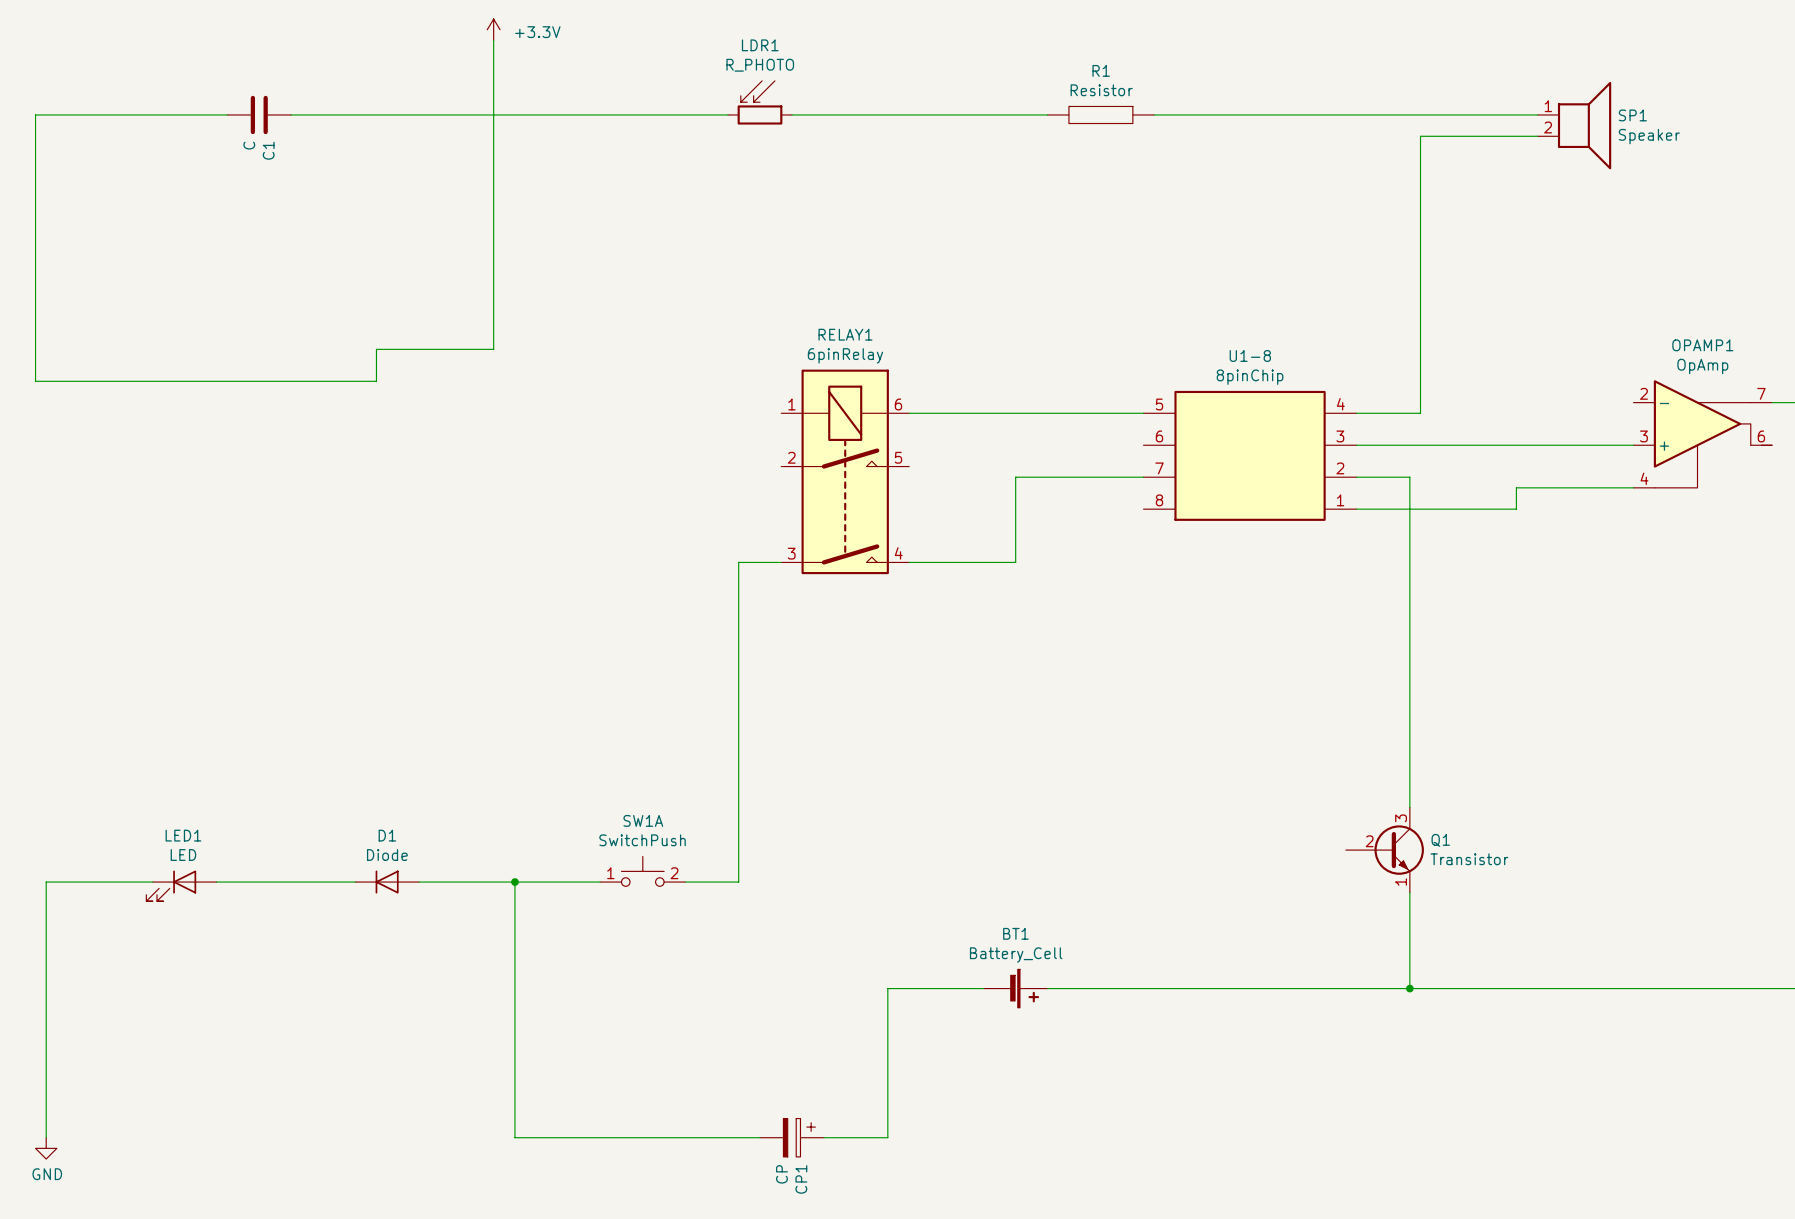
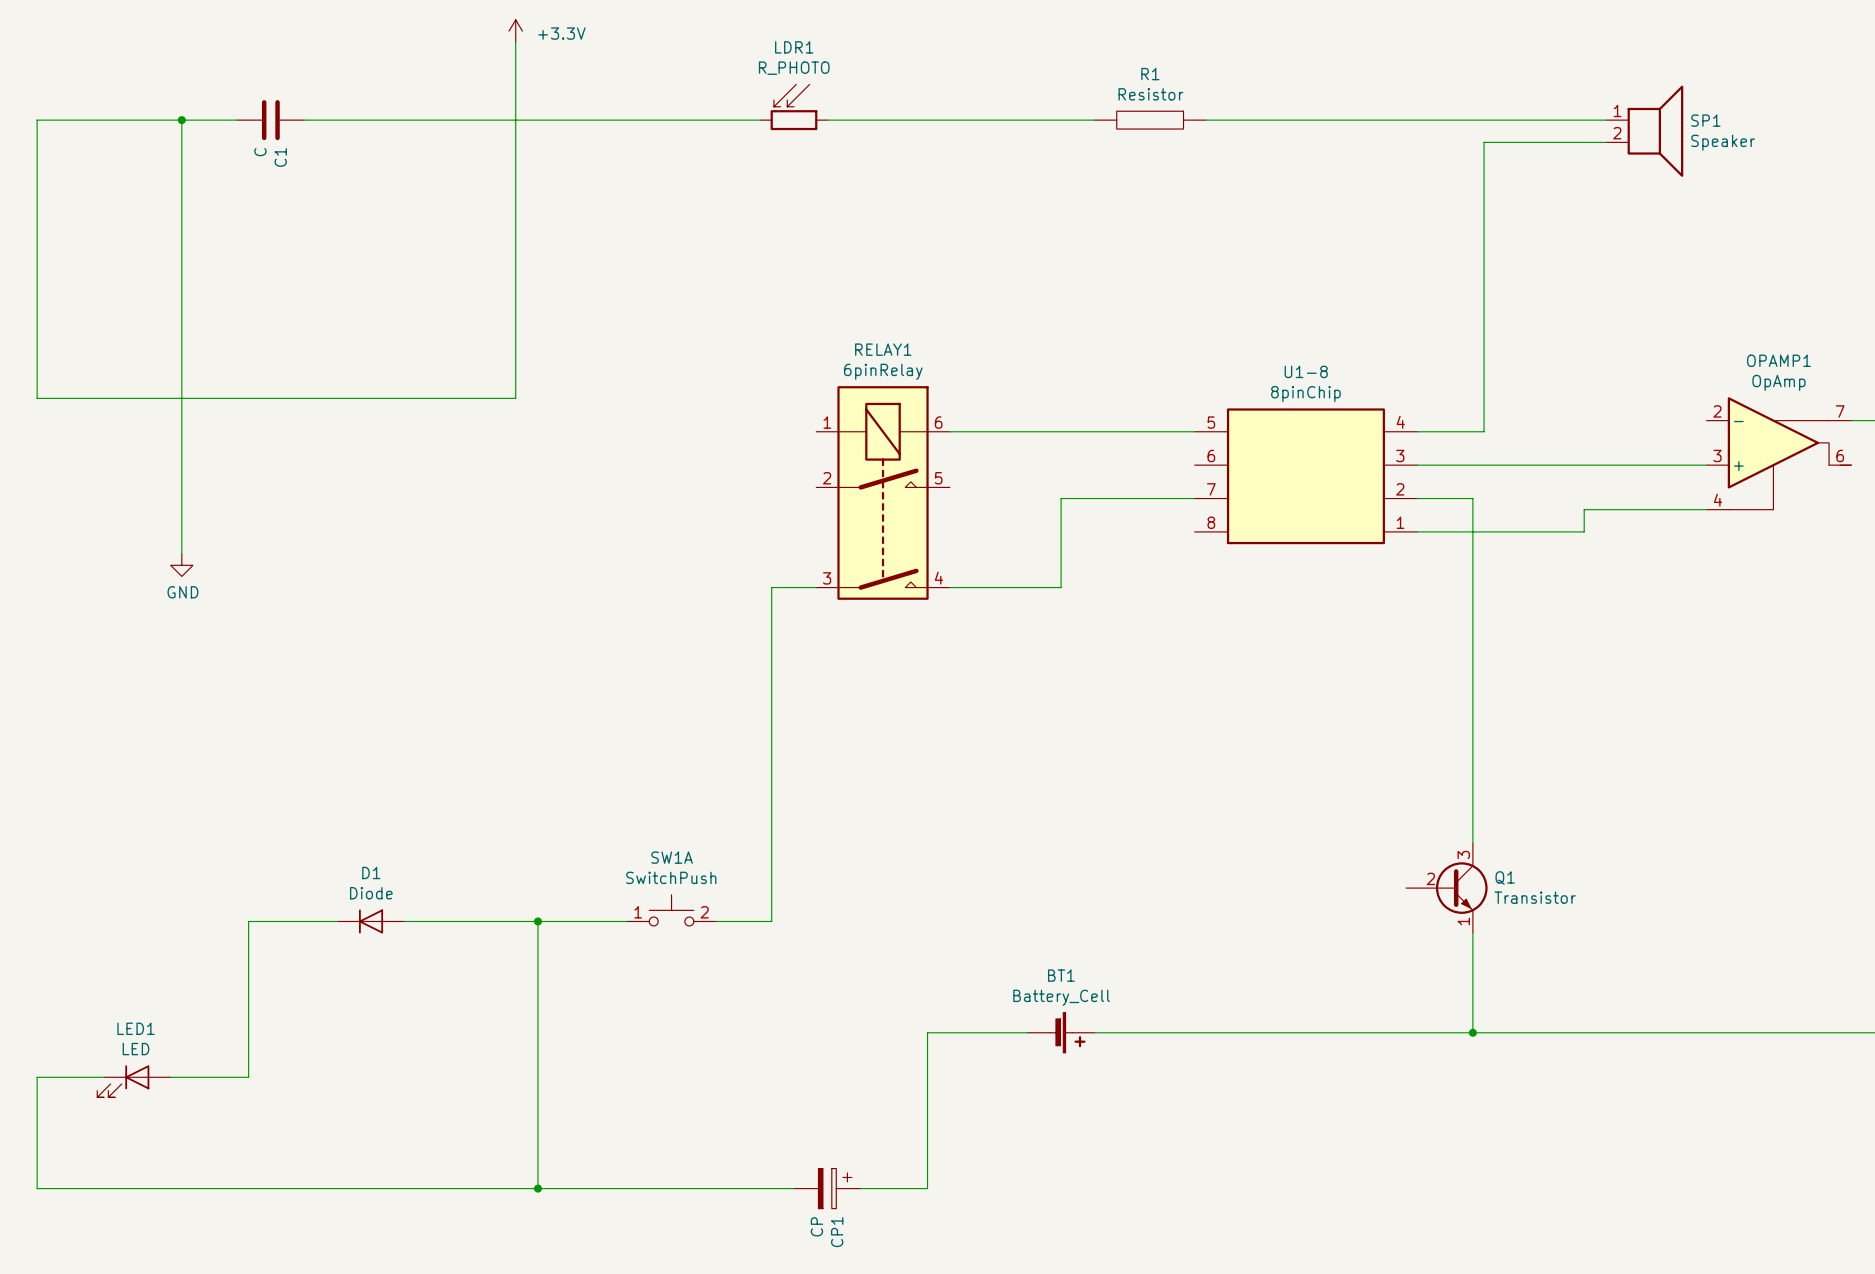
wire: none -> (181, 120) (181, 554)
junction: none -> (181, 120)
wire: (493, 349) (376, 349) (376, 381) -> (515, 364) (515, 398) (393, 398)
power symbol: none -> GND (181, 565)
wire: (152, 882) (46, 882) (46, 1137) -> none
wire: (216, 882) (237, 882) -> (170, 1077) (248, 1077) (248, 921)
D1 position: (387, 882) -> (371, 921)
LED1 position: (181, 885) -> (133, 1081)
wire: none -> (103, 1077) (37, 1077) (37, 1188) (537, 1188)
junction: none -> (537, 1188)
power symbol: GND (46, 1148) -> none

